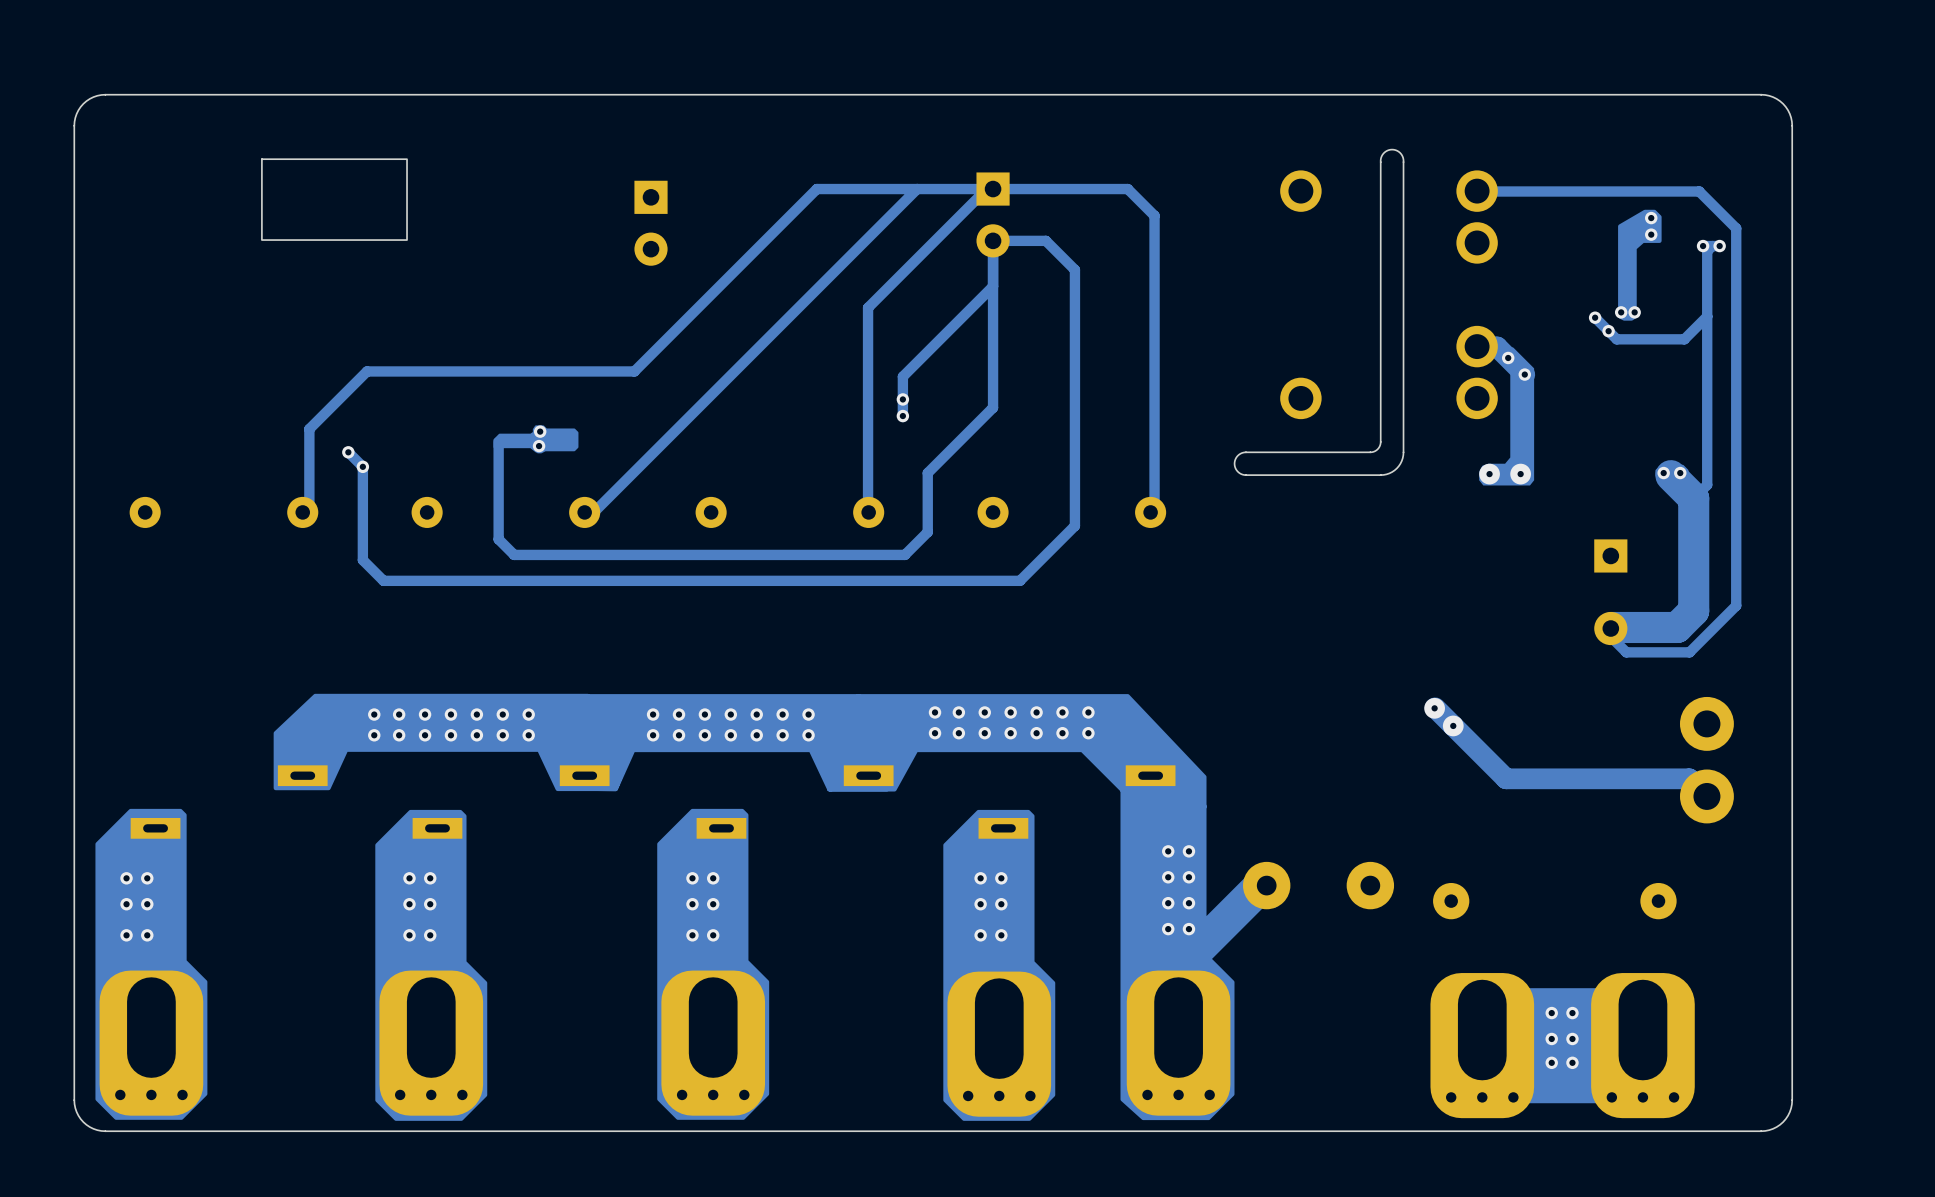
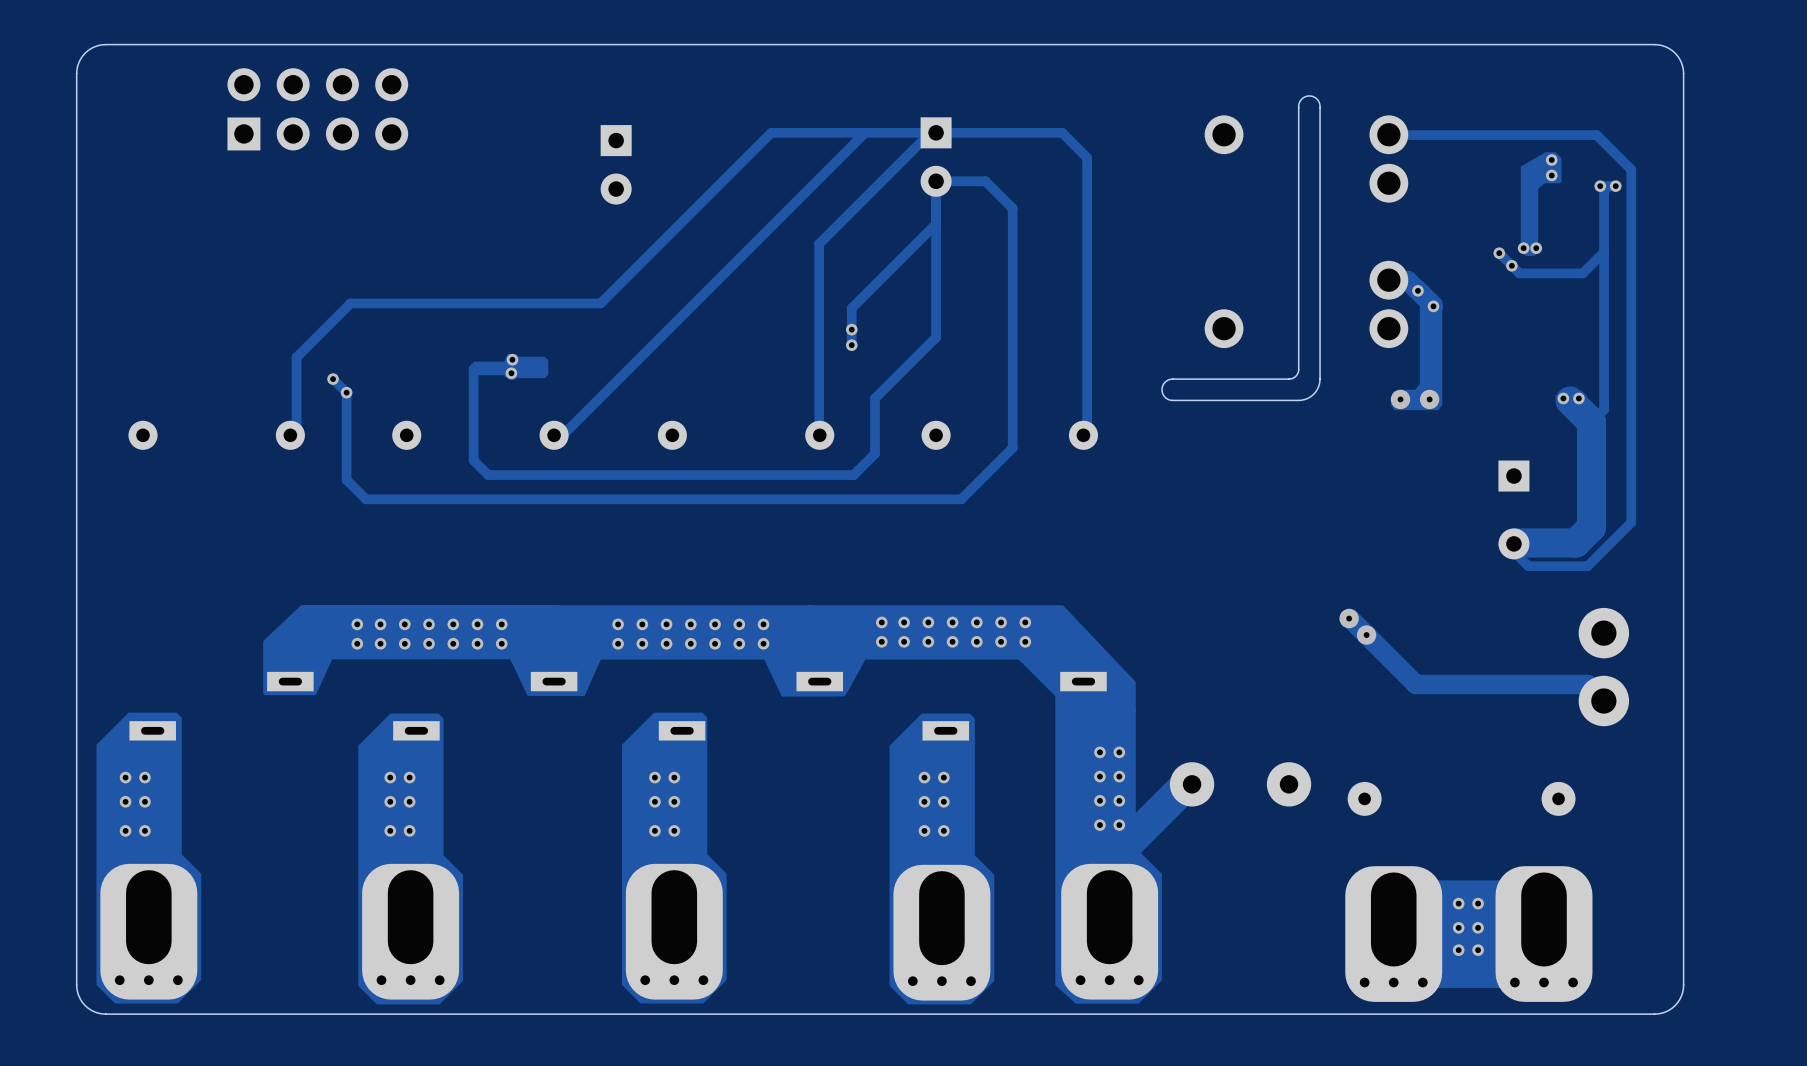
part: none -> (317, 109)
part: (334, 199) -> none

